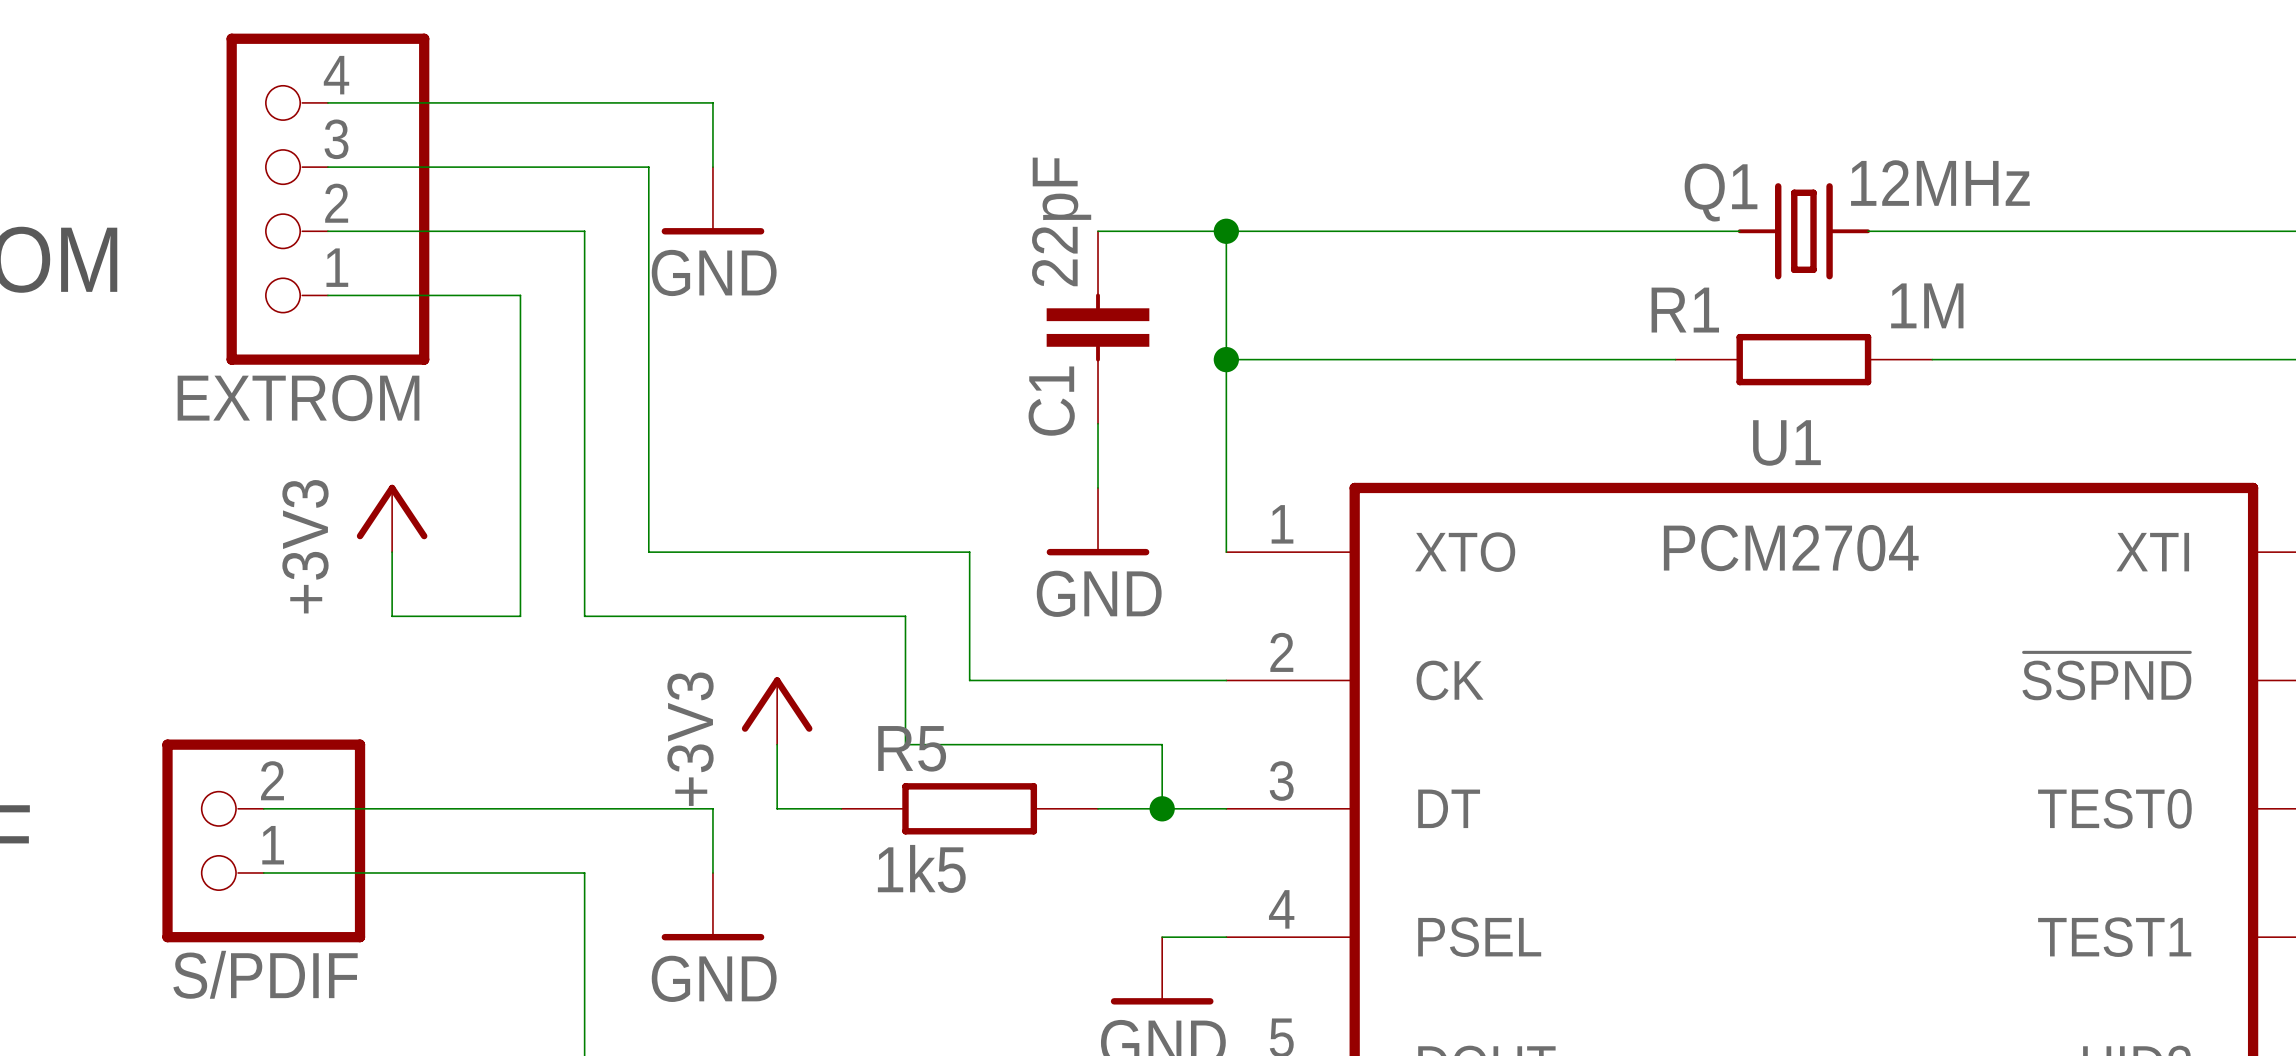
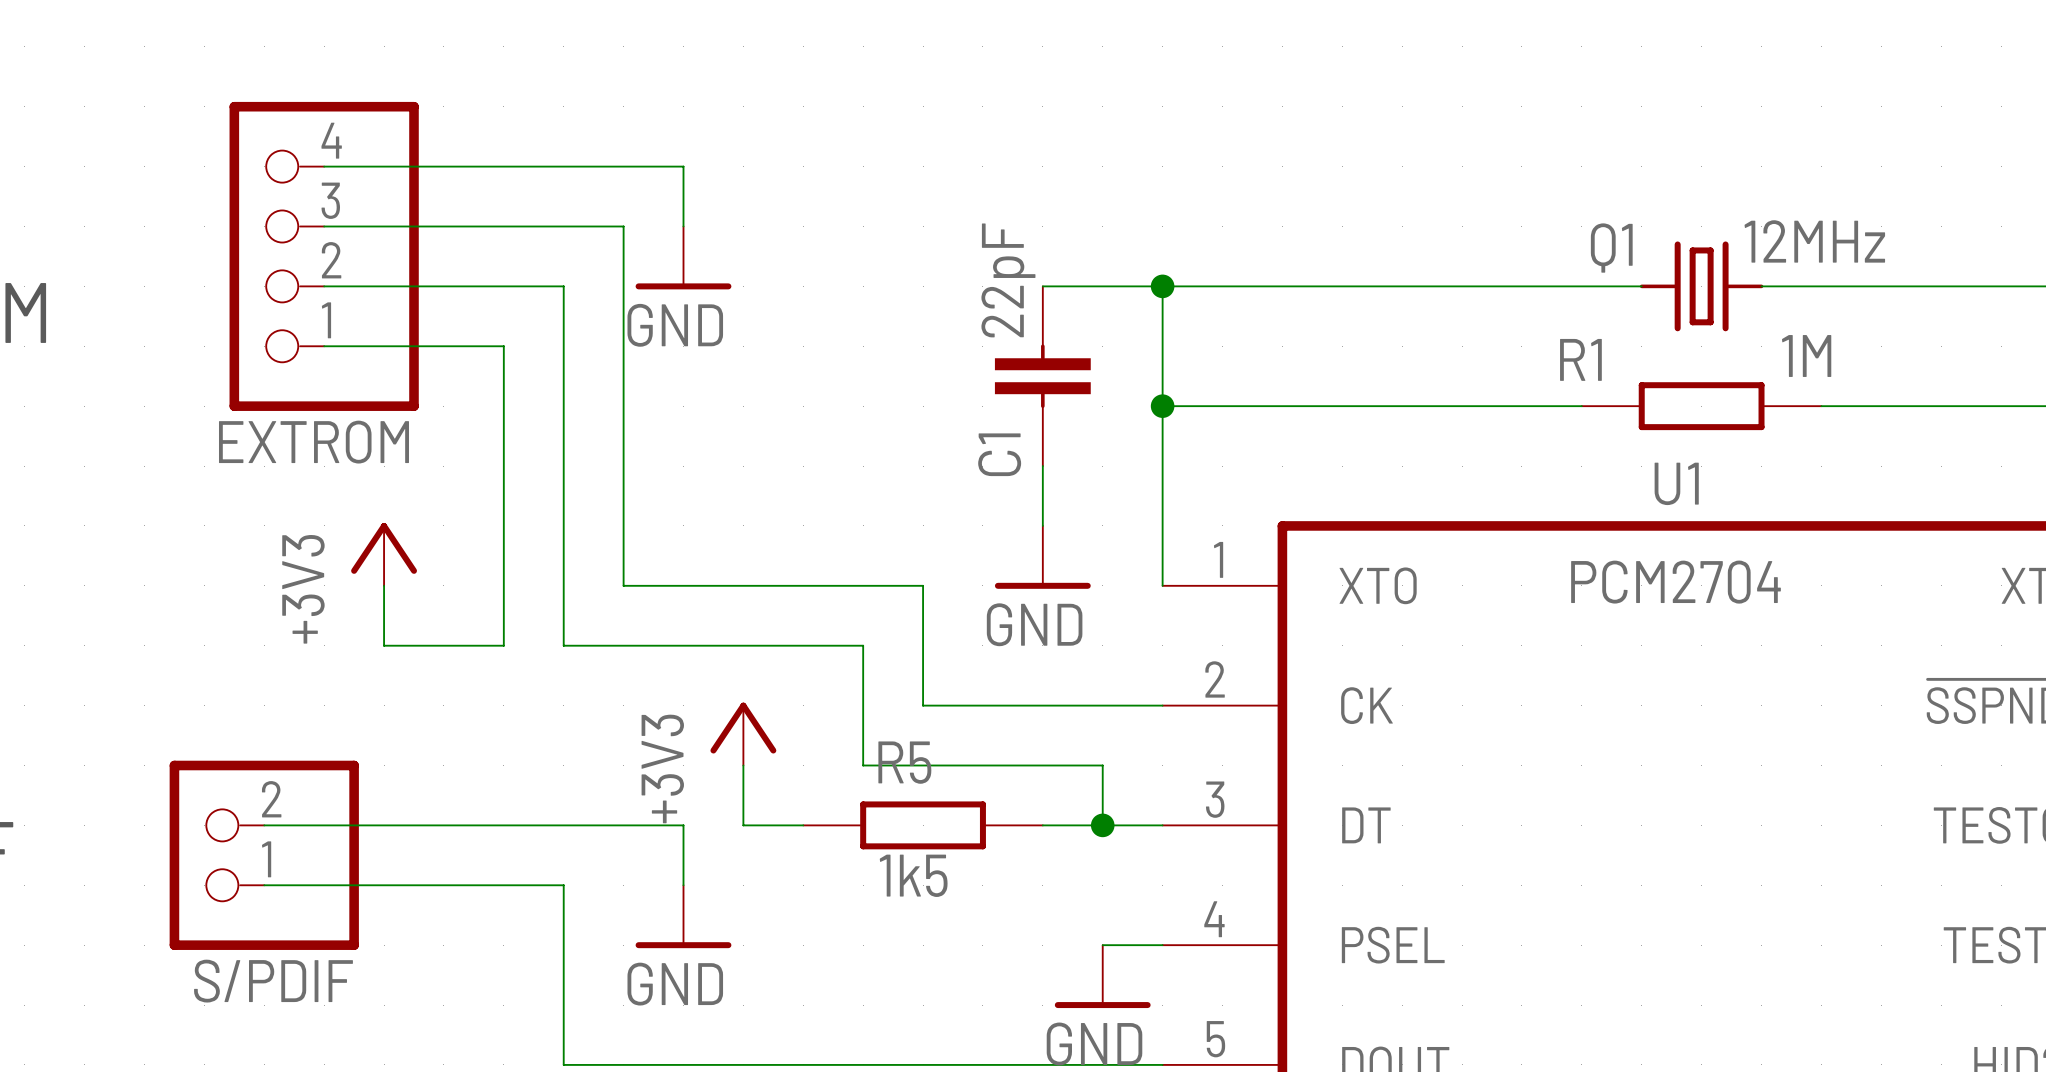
R5 name position: R5 (912, 748) -> R5 (904, 762)
R5 value position: 1k5 (921, 868) -> 1k5 (913, 875)

